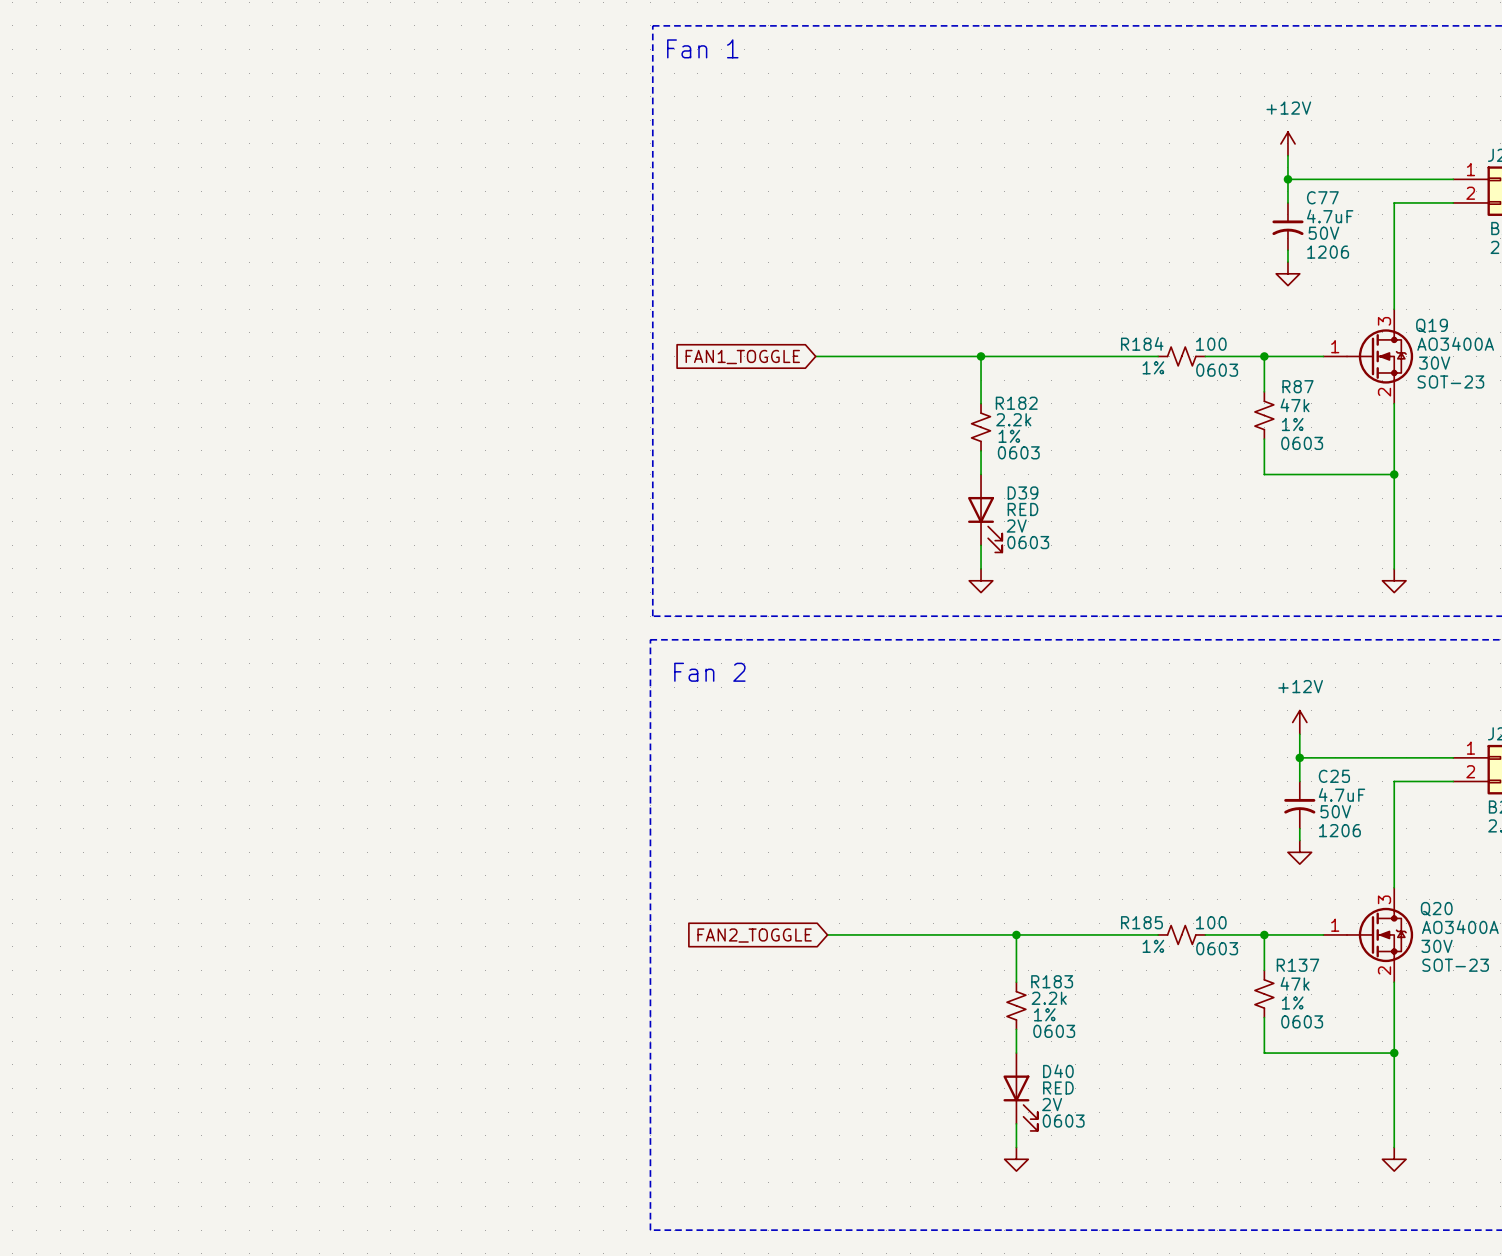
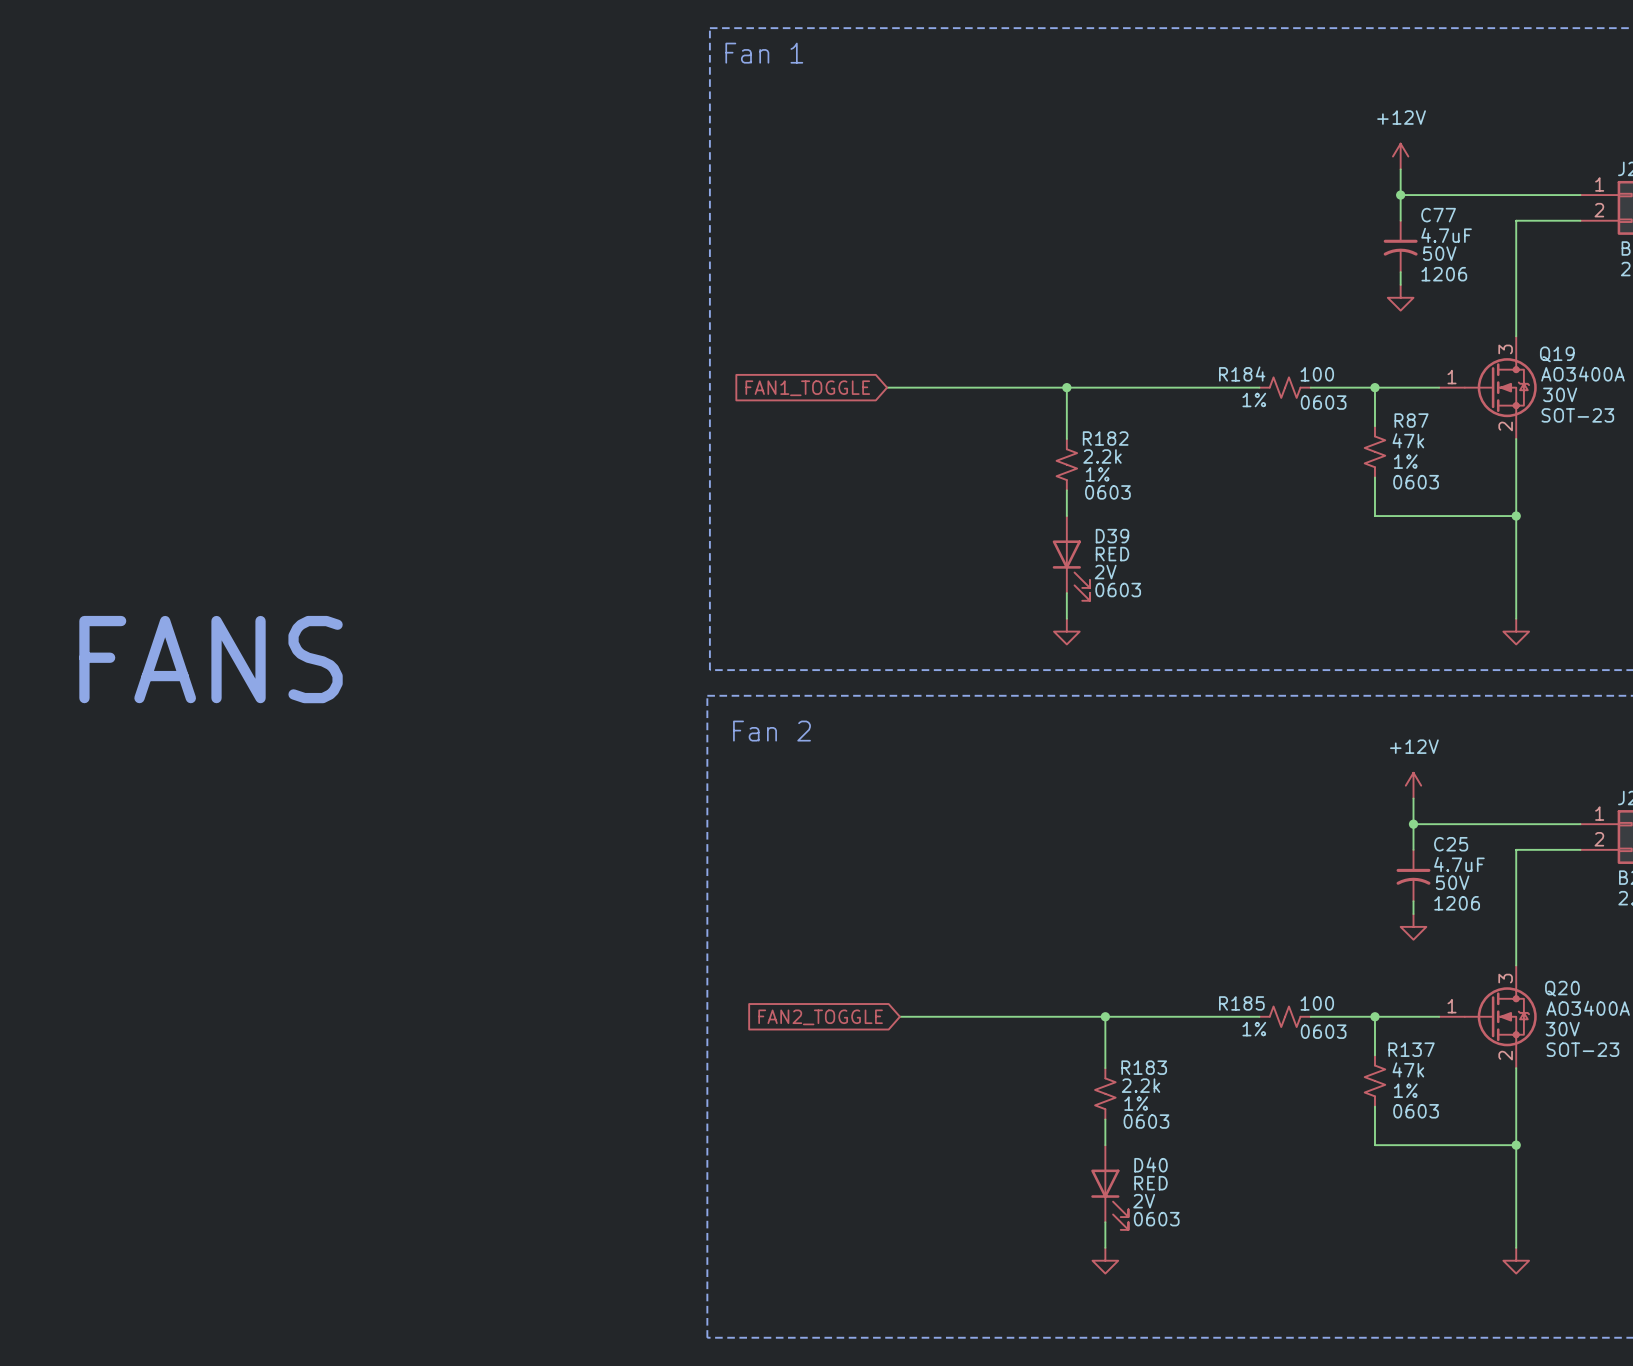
text: none -> FANS (211, 659)

